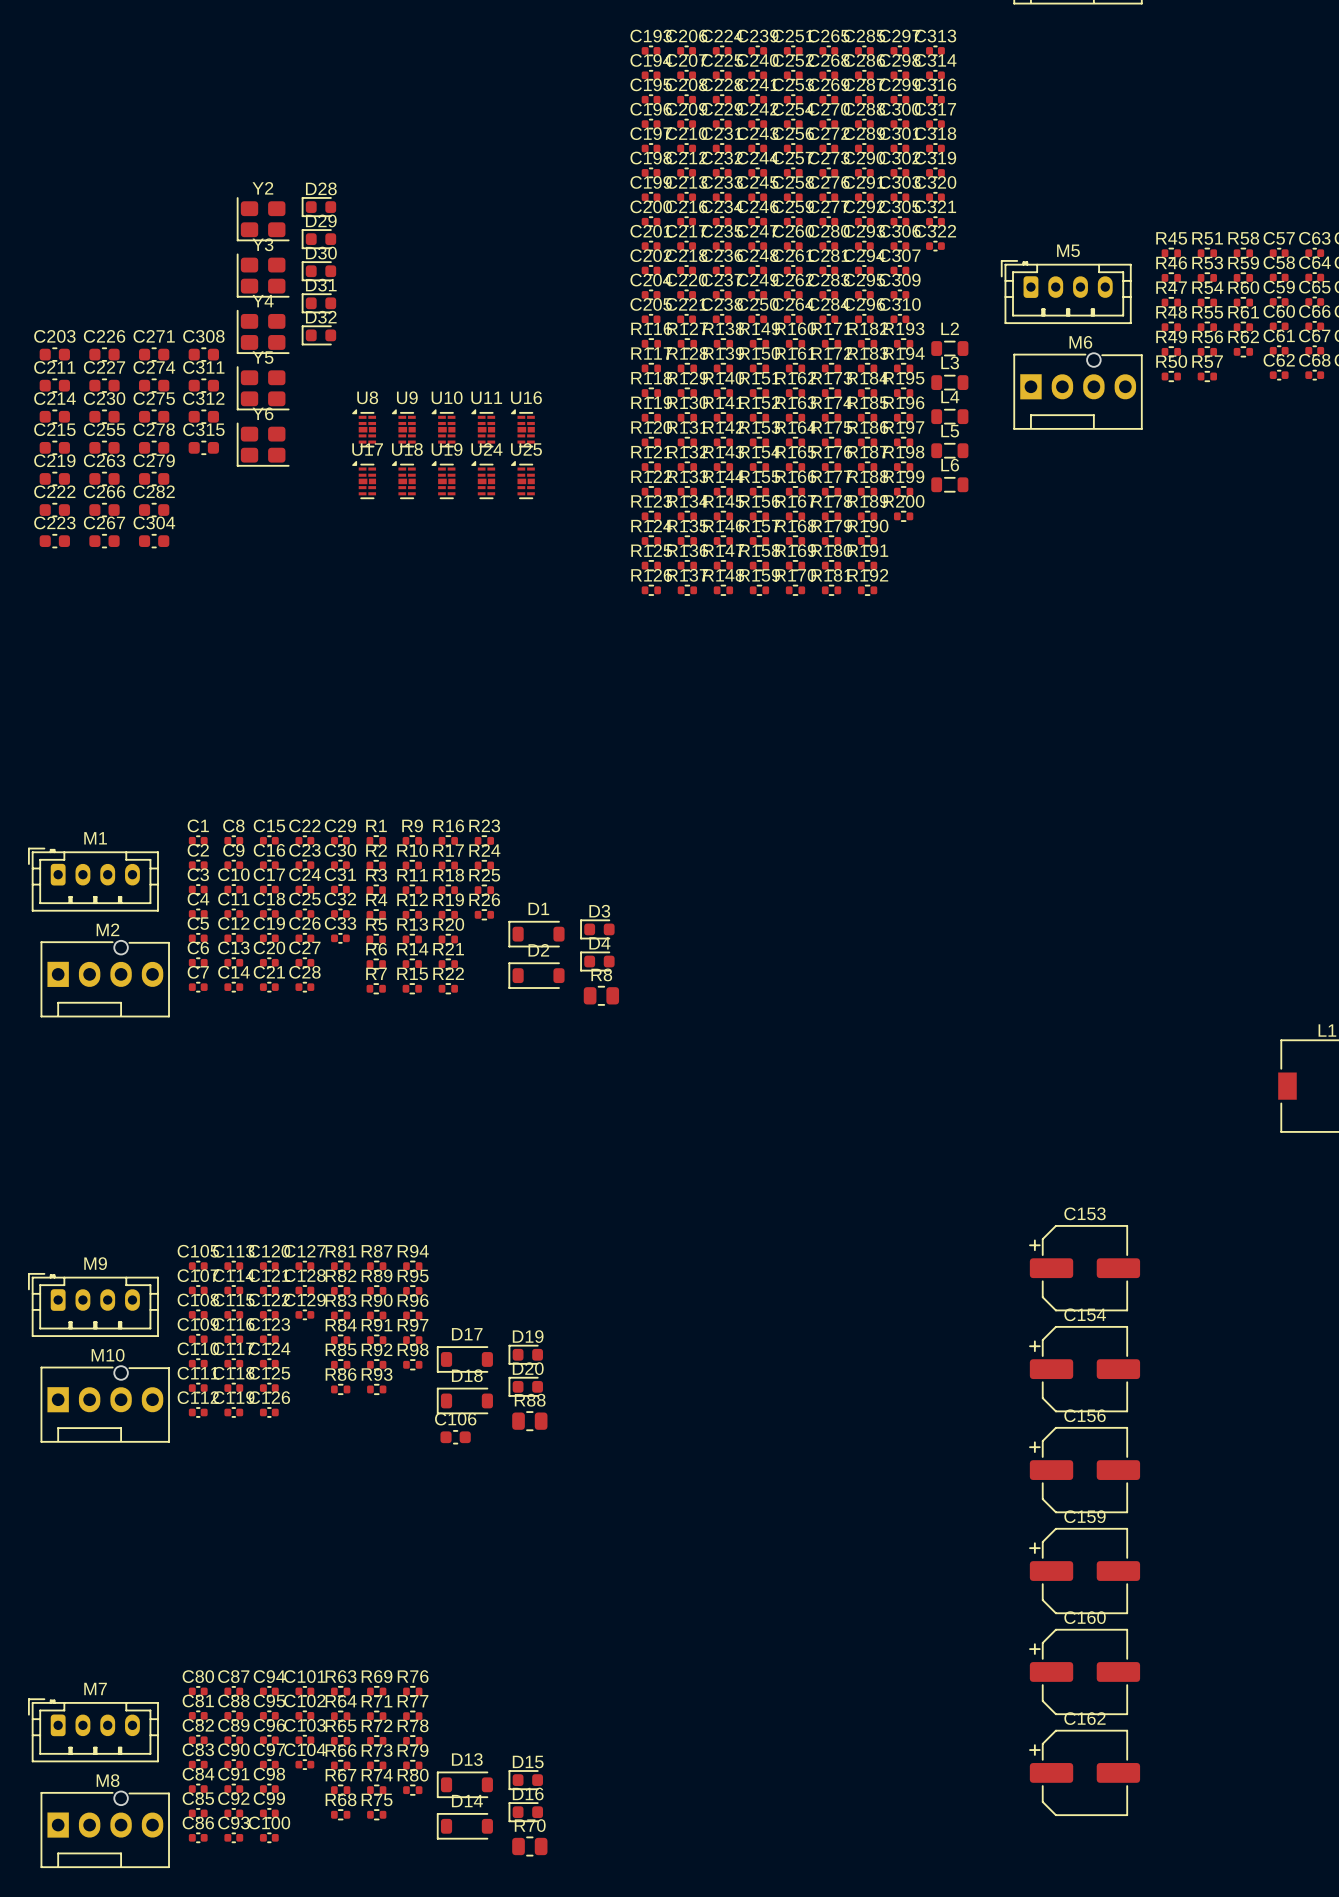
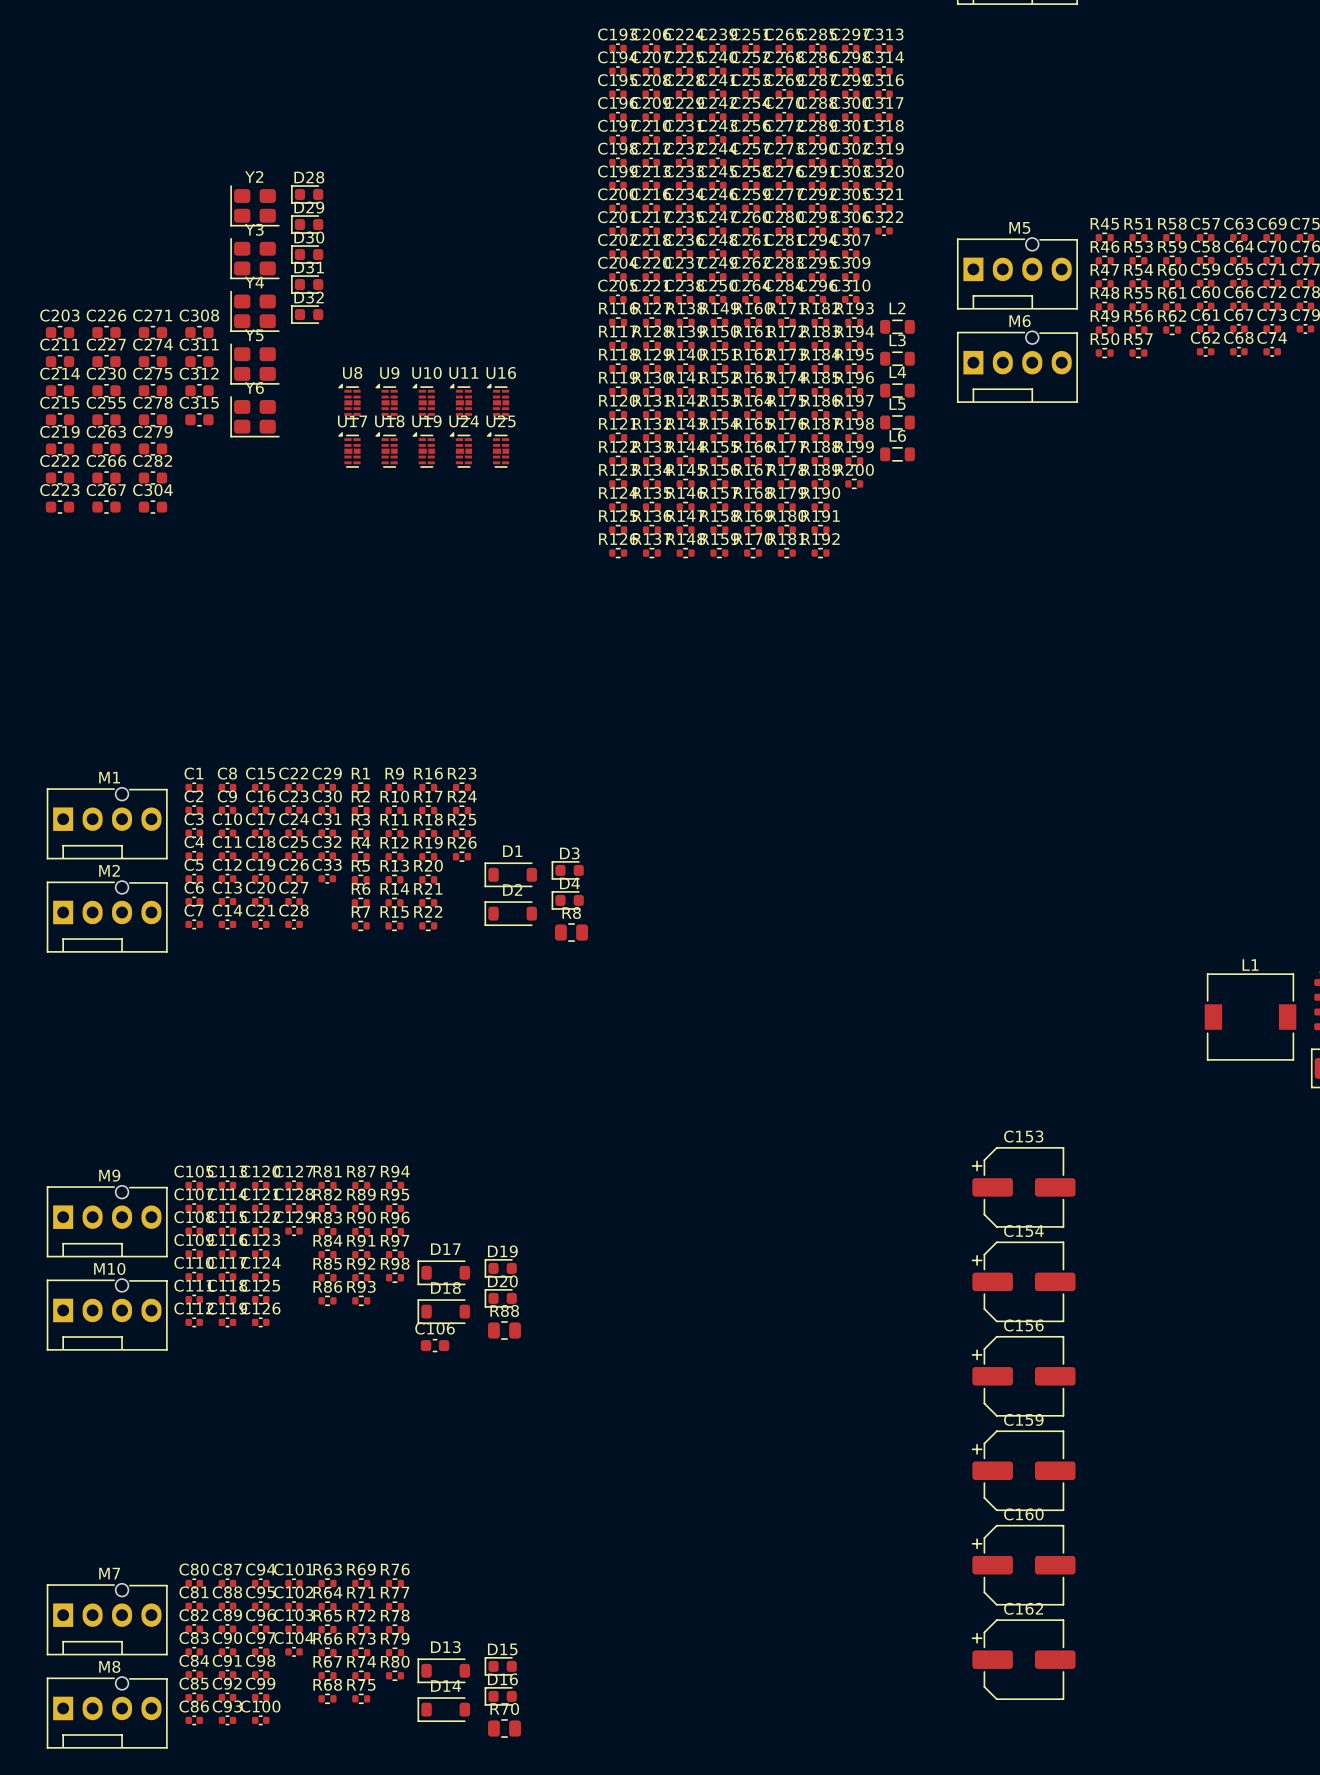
M5 footprint: [1000, 260, 1132, 324] -> [957, 237, 1078, 310]
M1 footprint: [28, 847, 159, 912] -> [46, 787, 168, 860]
M9 footprint: [28, 1273, 159, 1337] -> [46, 1185, 168, 1258]
M7 footprint: [28, 1698, 159, 1763] -> [46, 1583, 168, 1656]

